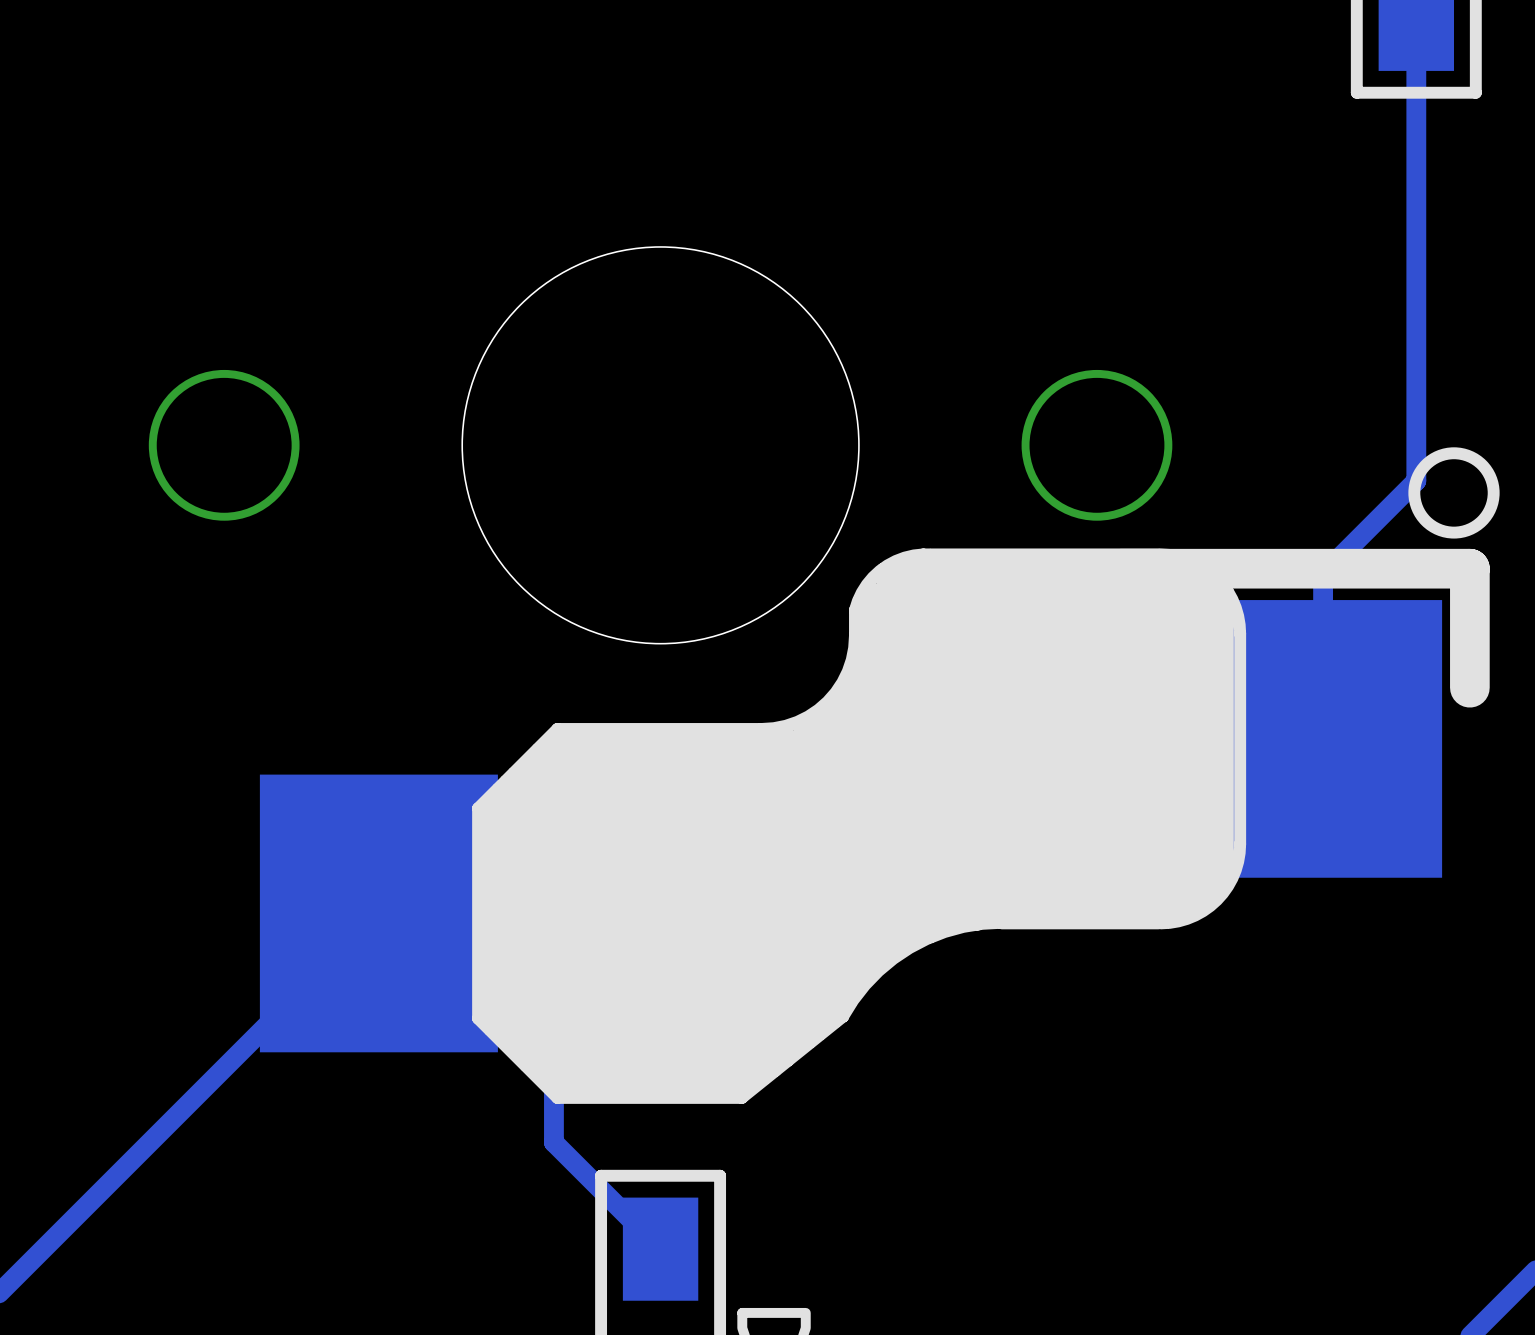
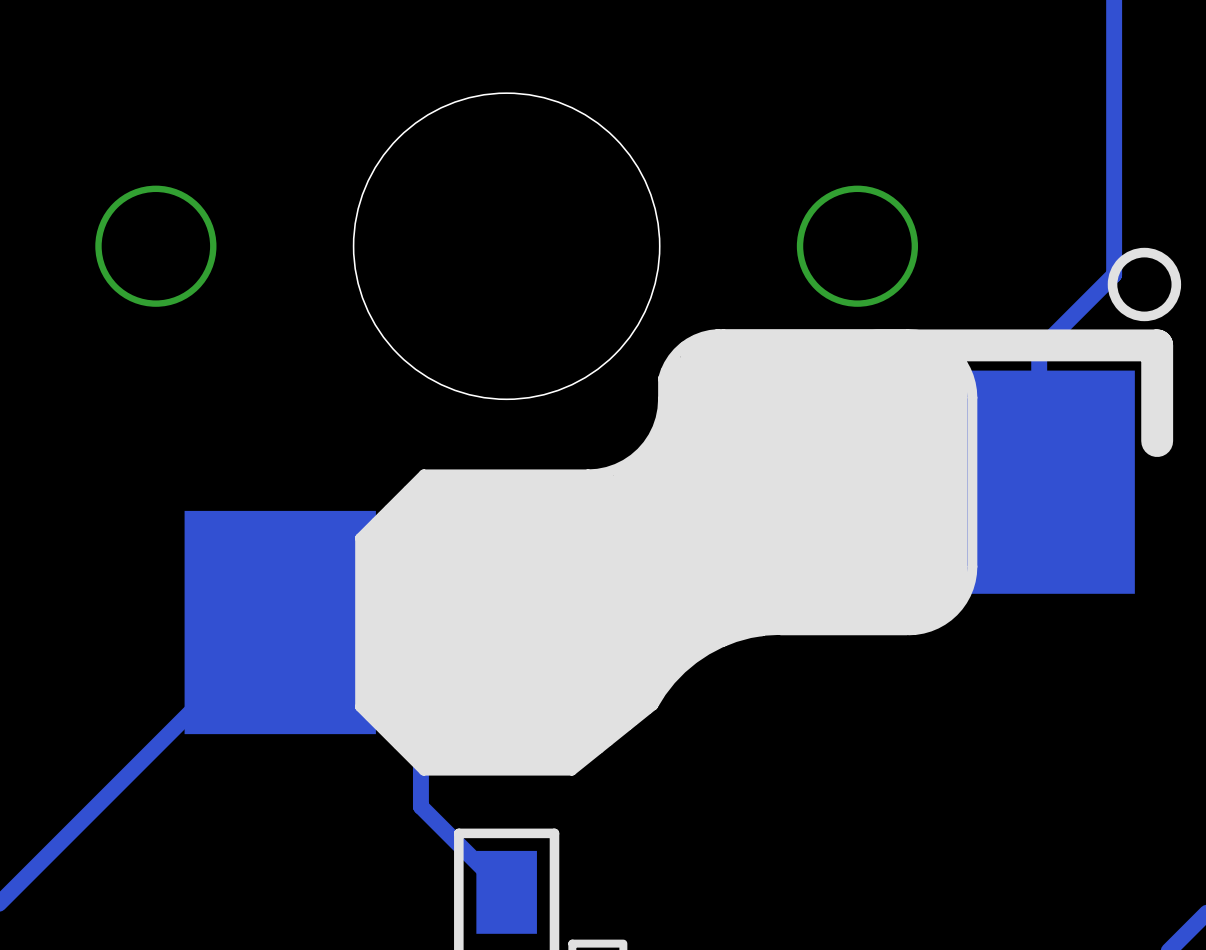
part footprint: [148, 246, 1500, 1104] -> [95, 93, 1182, 776]

